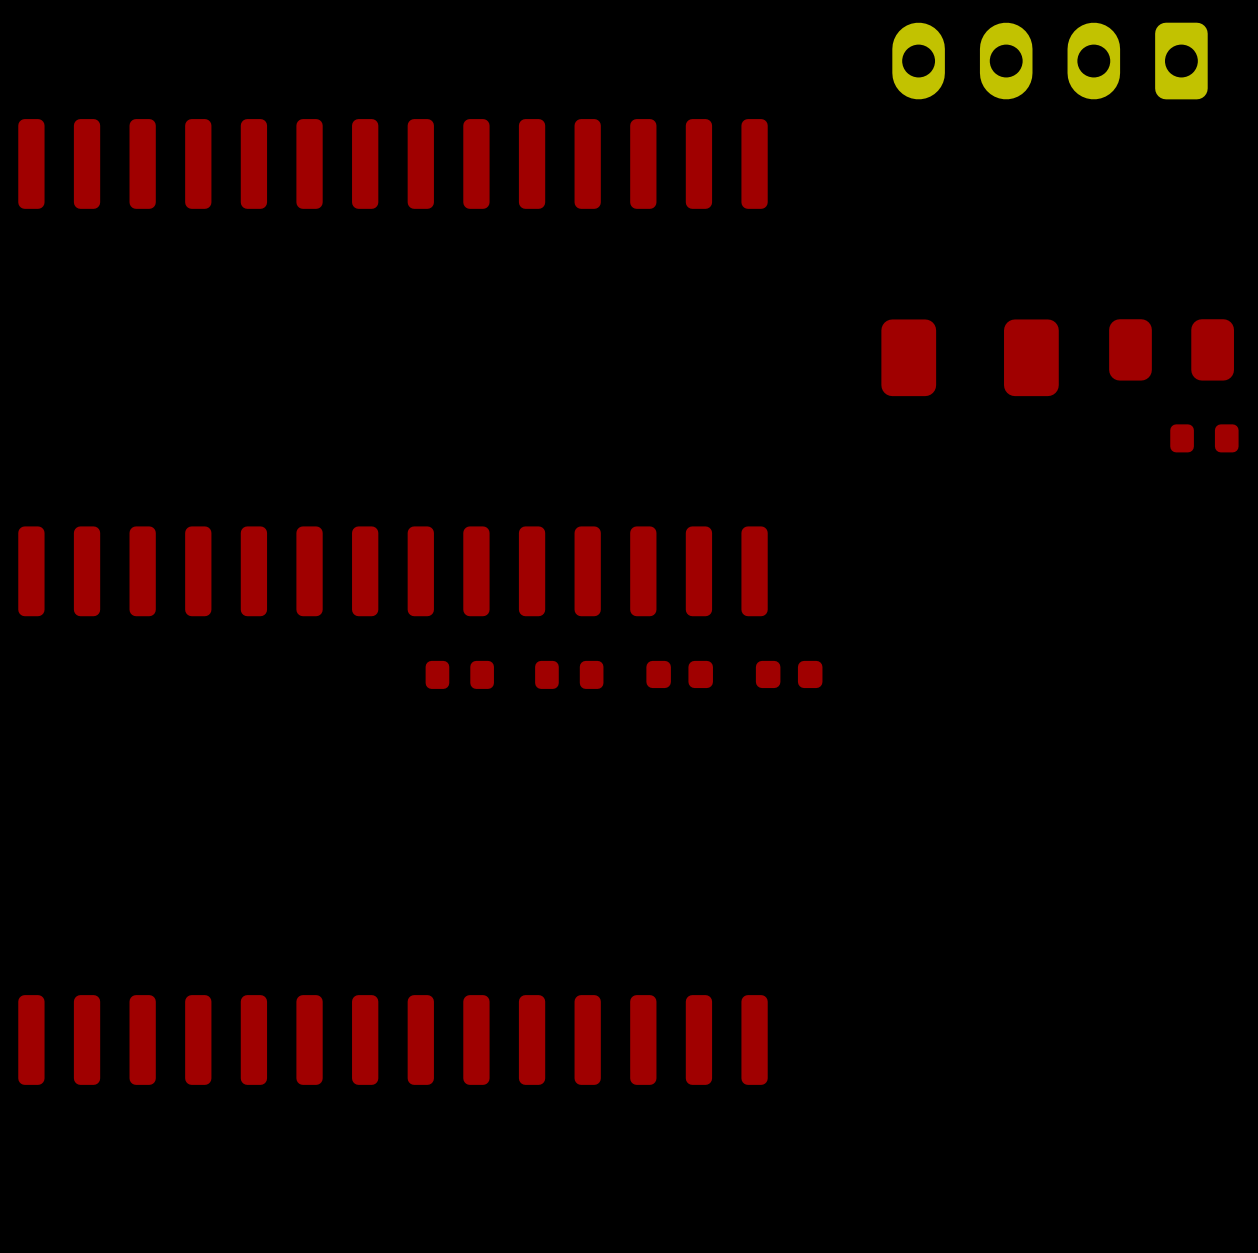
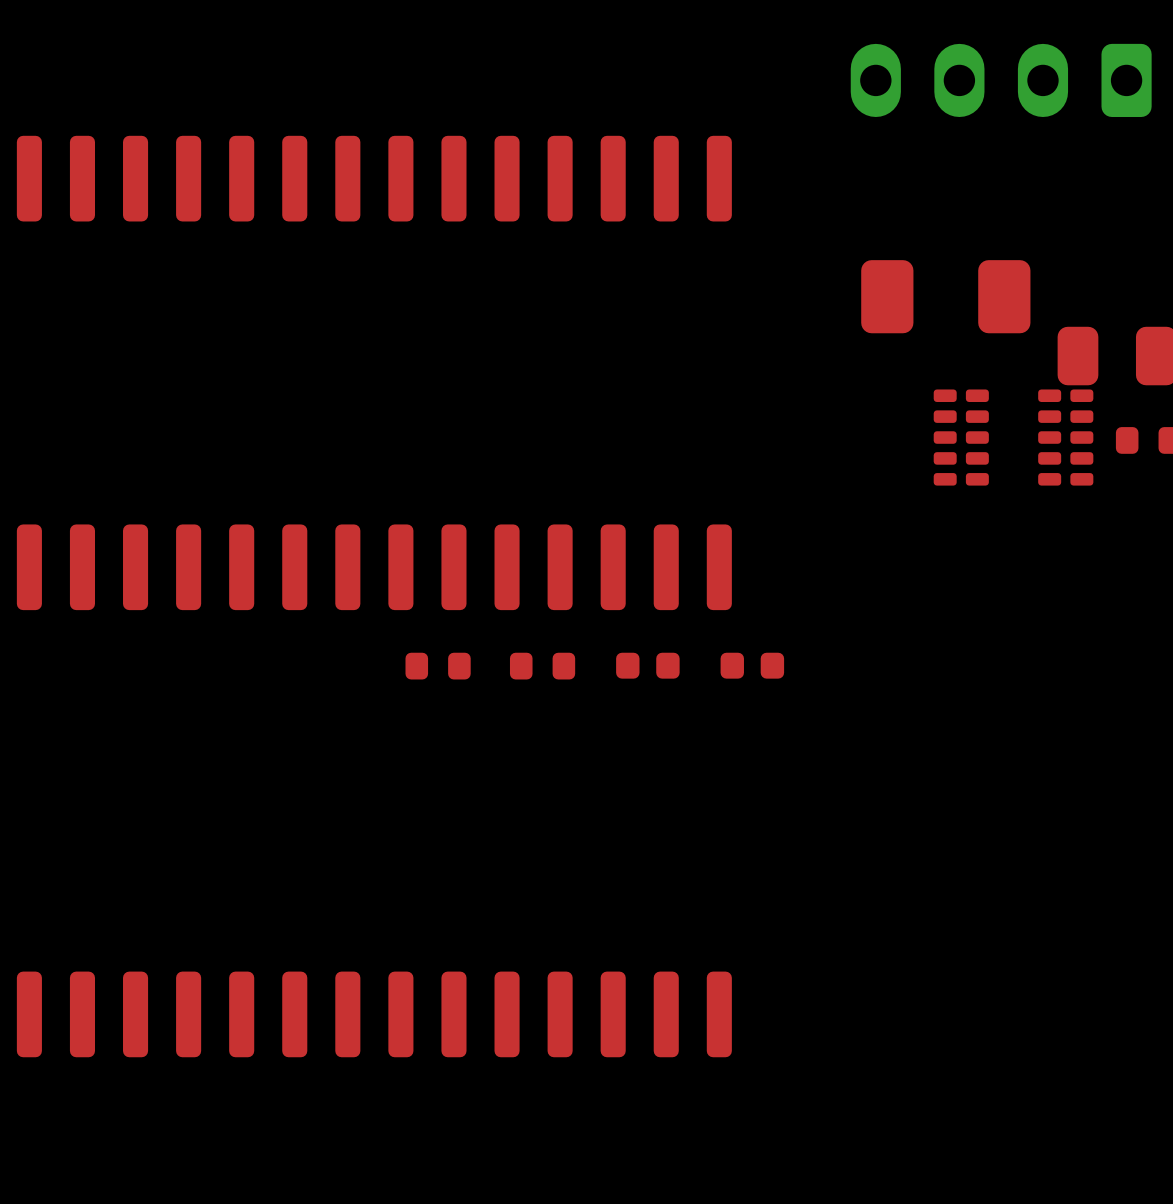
part position: (970, 357) -> (945, 296)
part: none -> (961, 437)
part: none -> (1065, 437)

